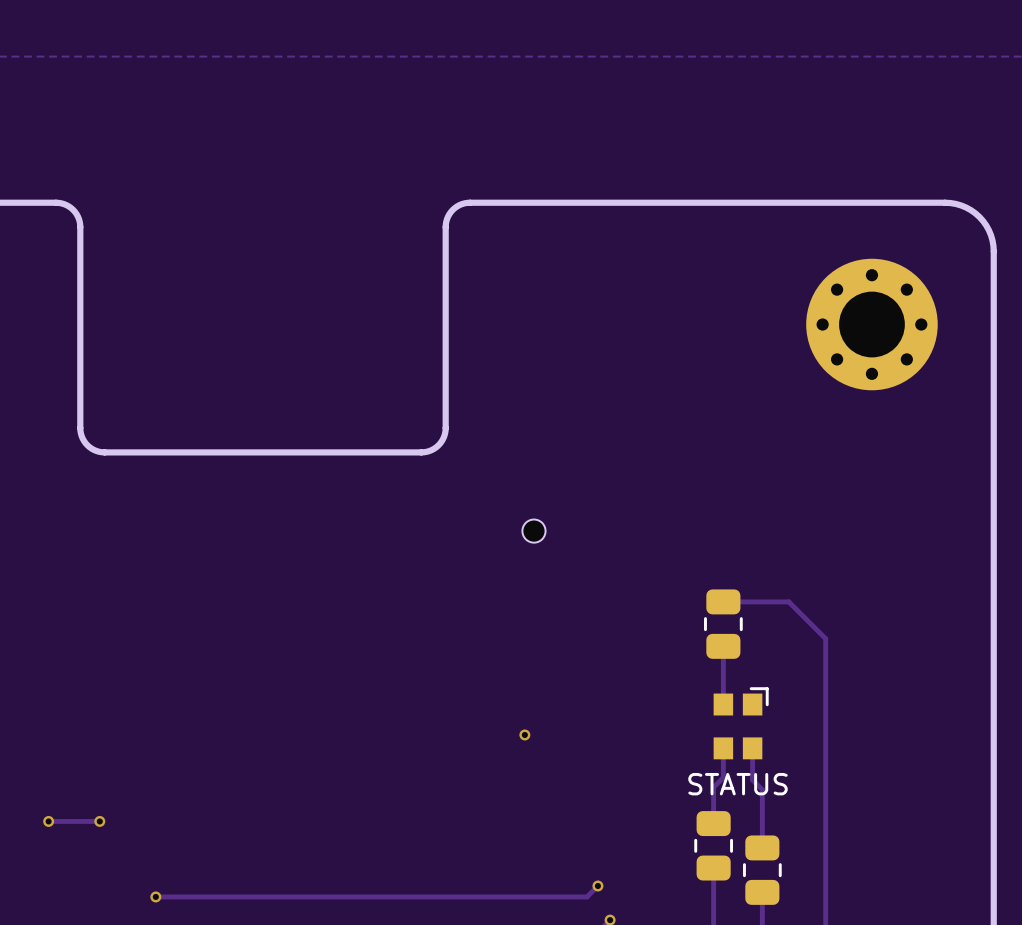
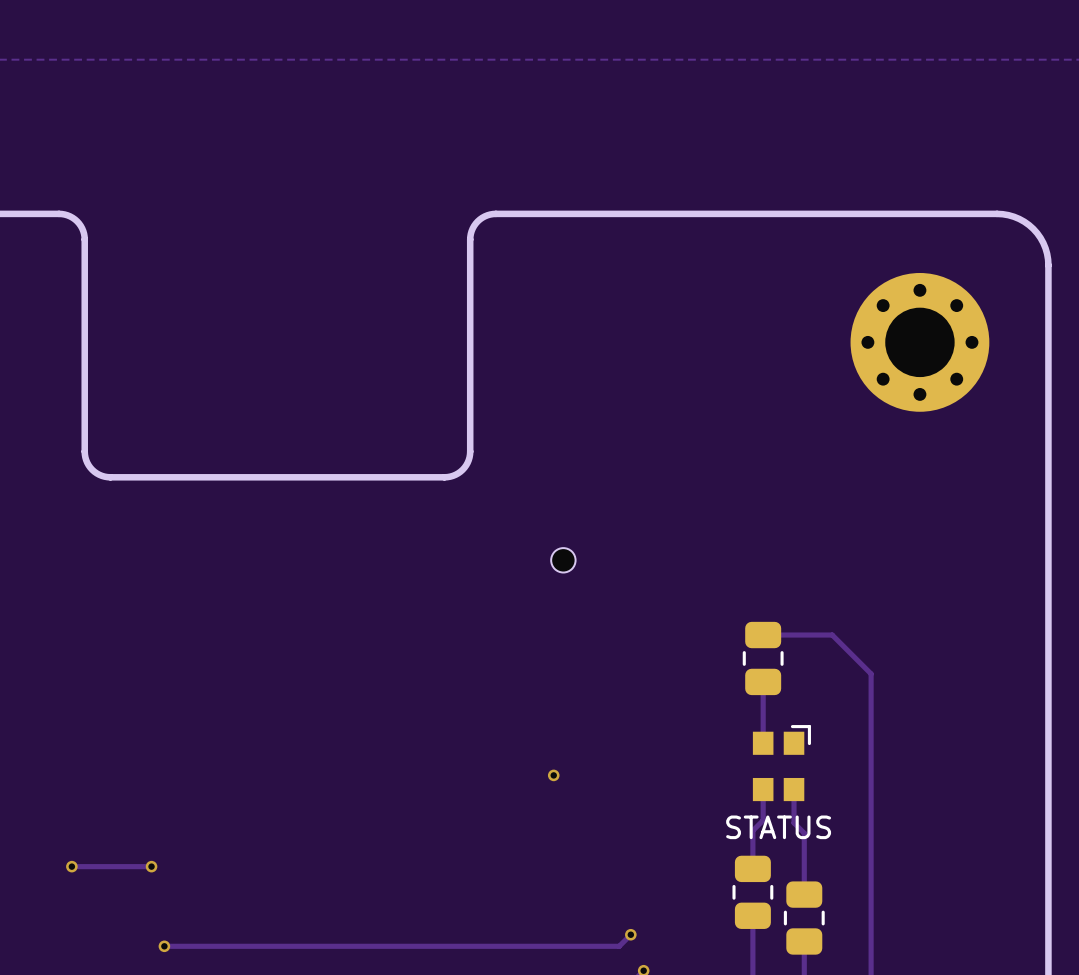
track: (48, 821) (68, 821) -> none
via: (48, 821) -> none
via: none -> (71, 866)
track: none -> (105, 866) (151, 866)
via: (99, 821) -> none
via: none -> (151, 866)

